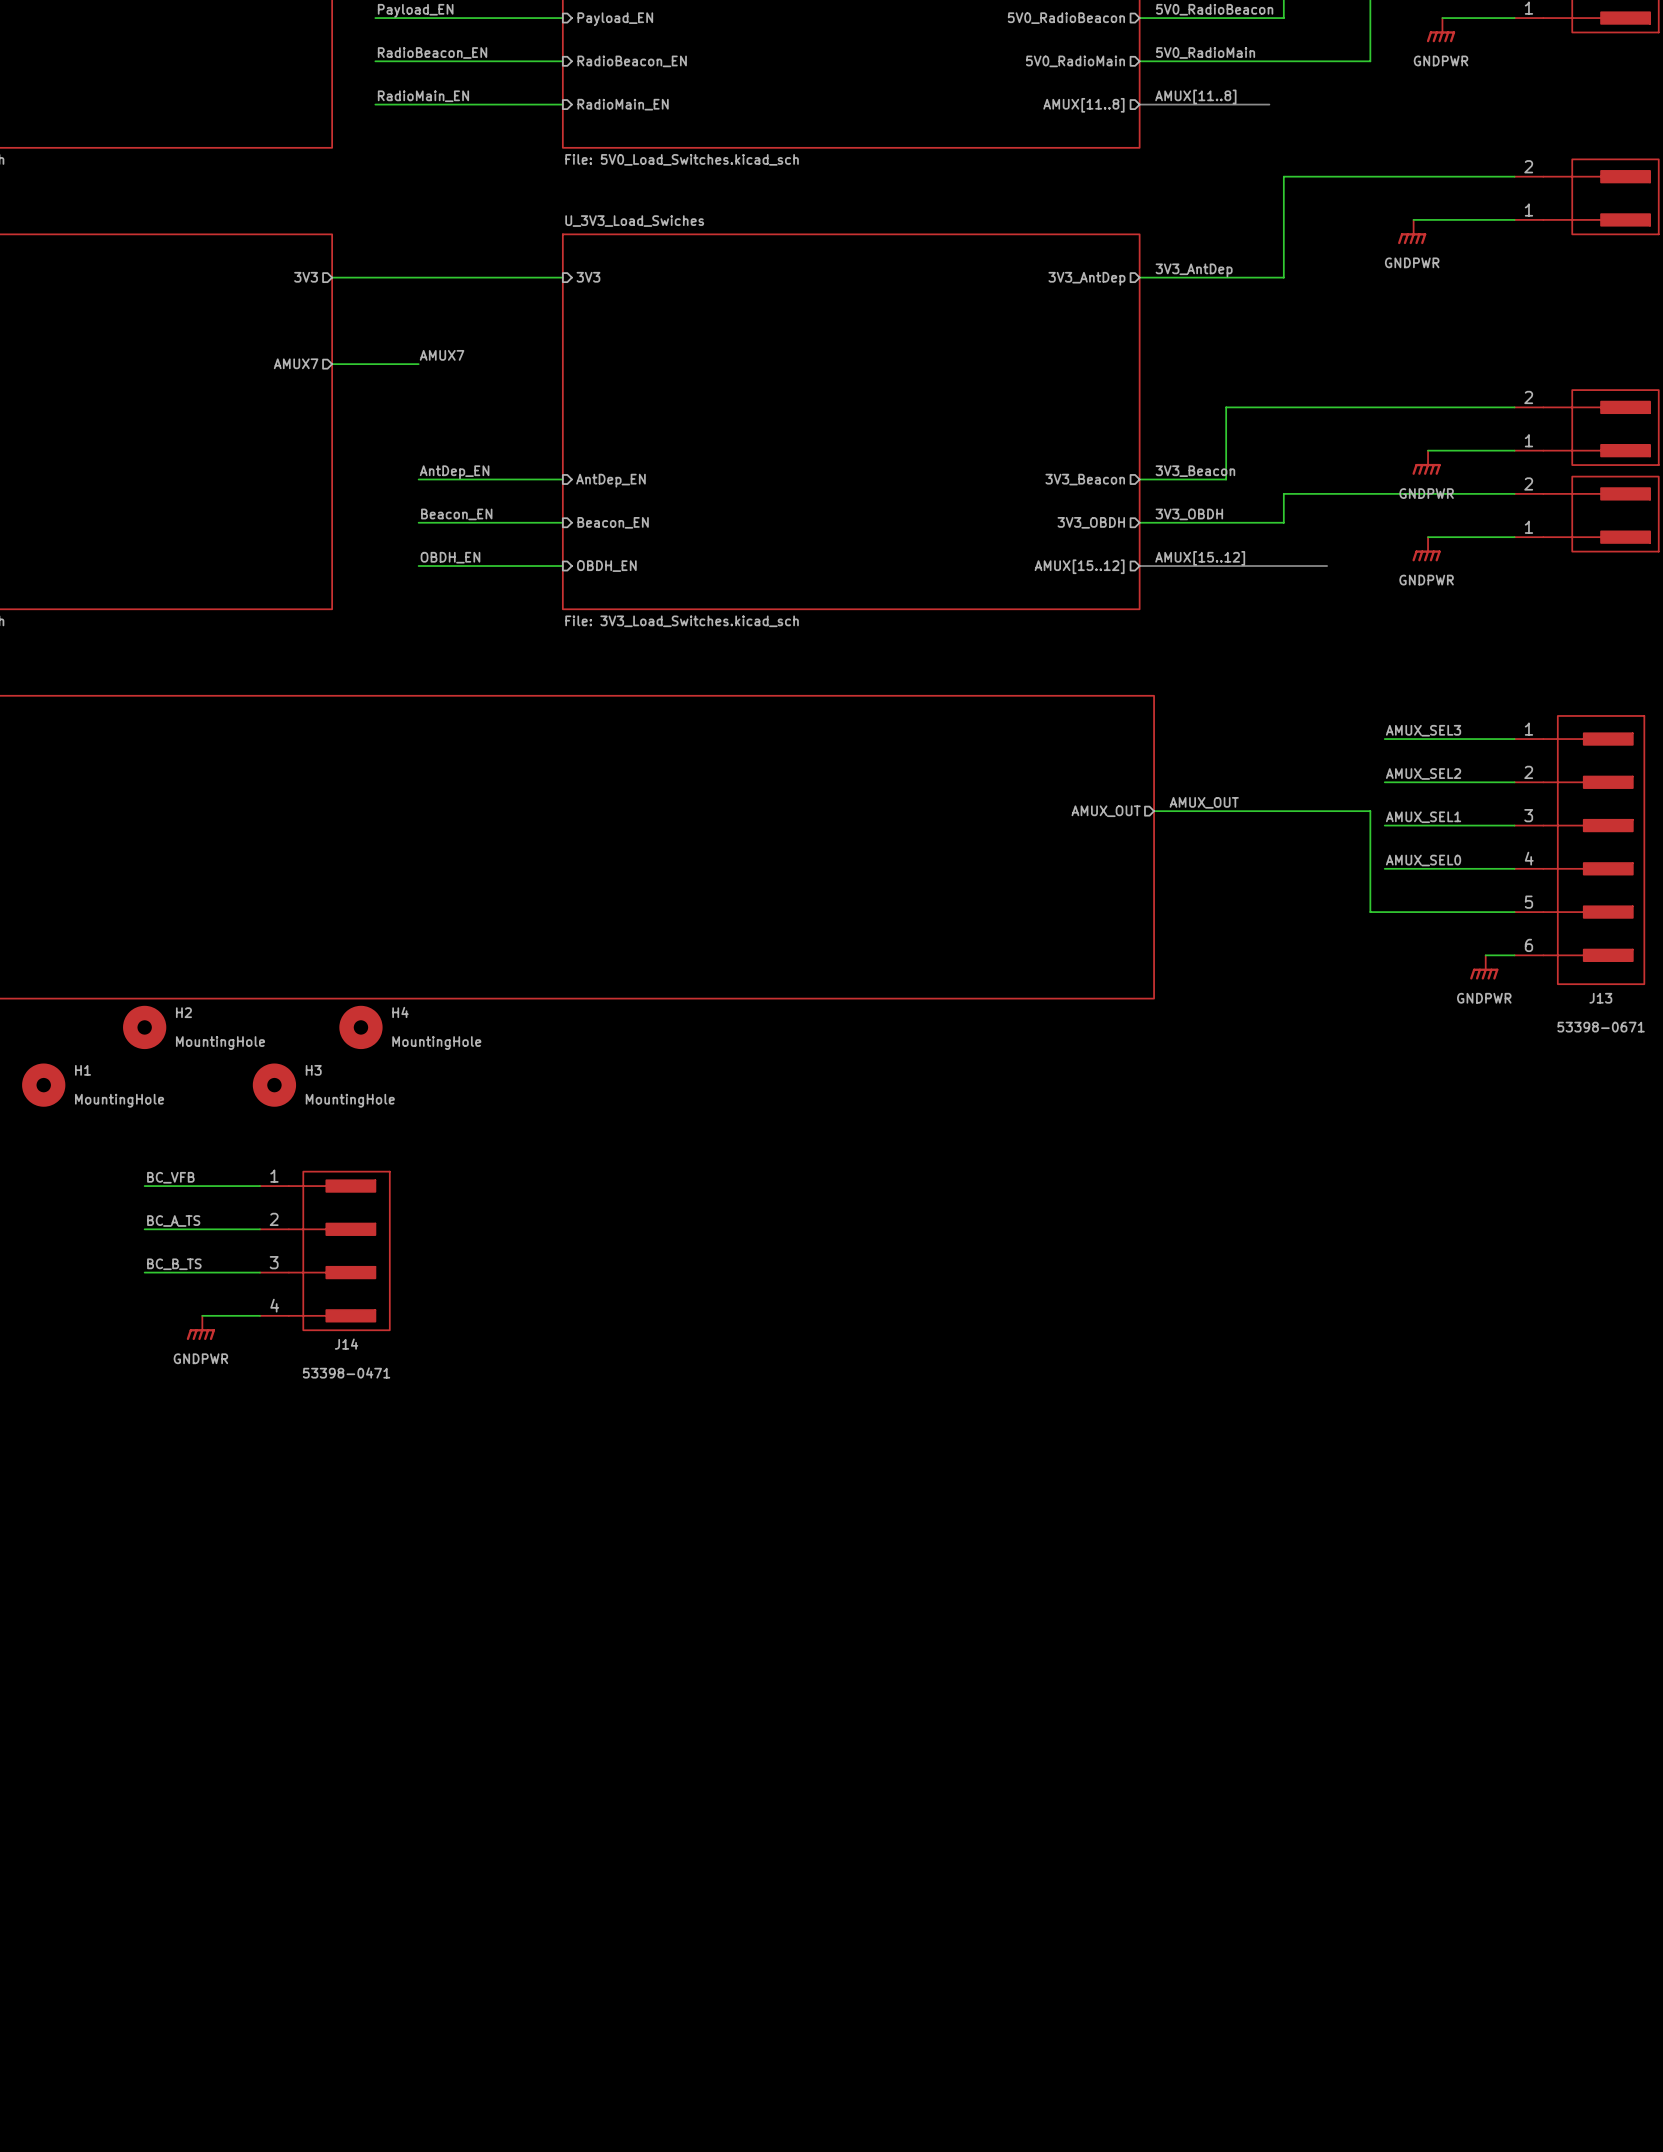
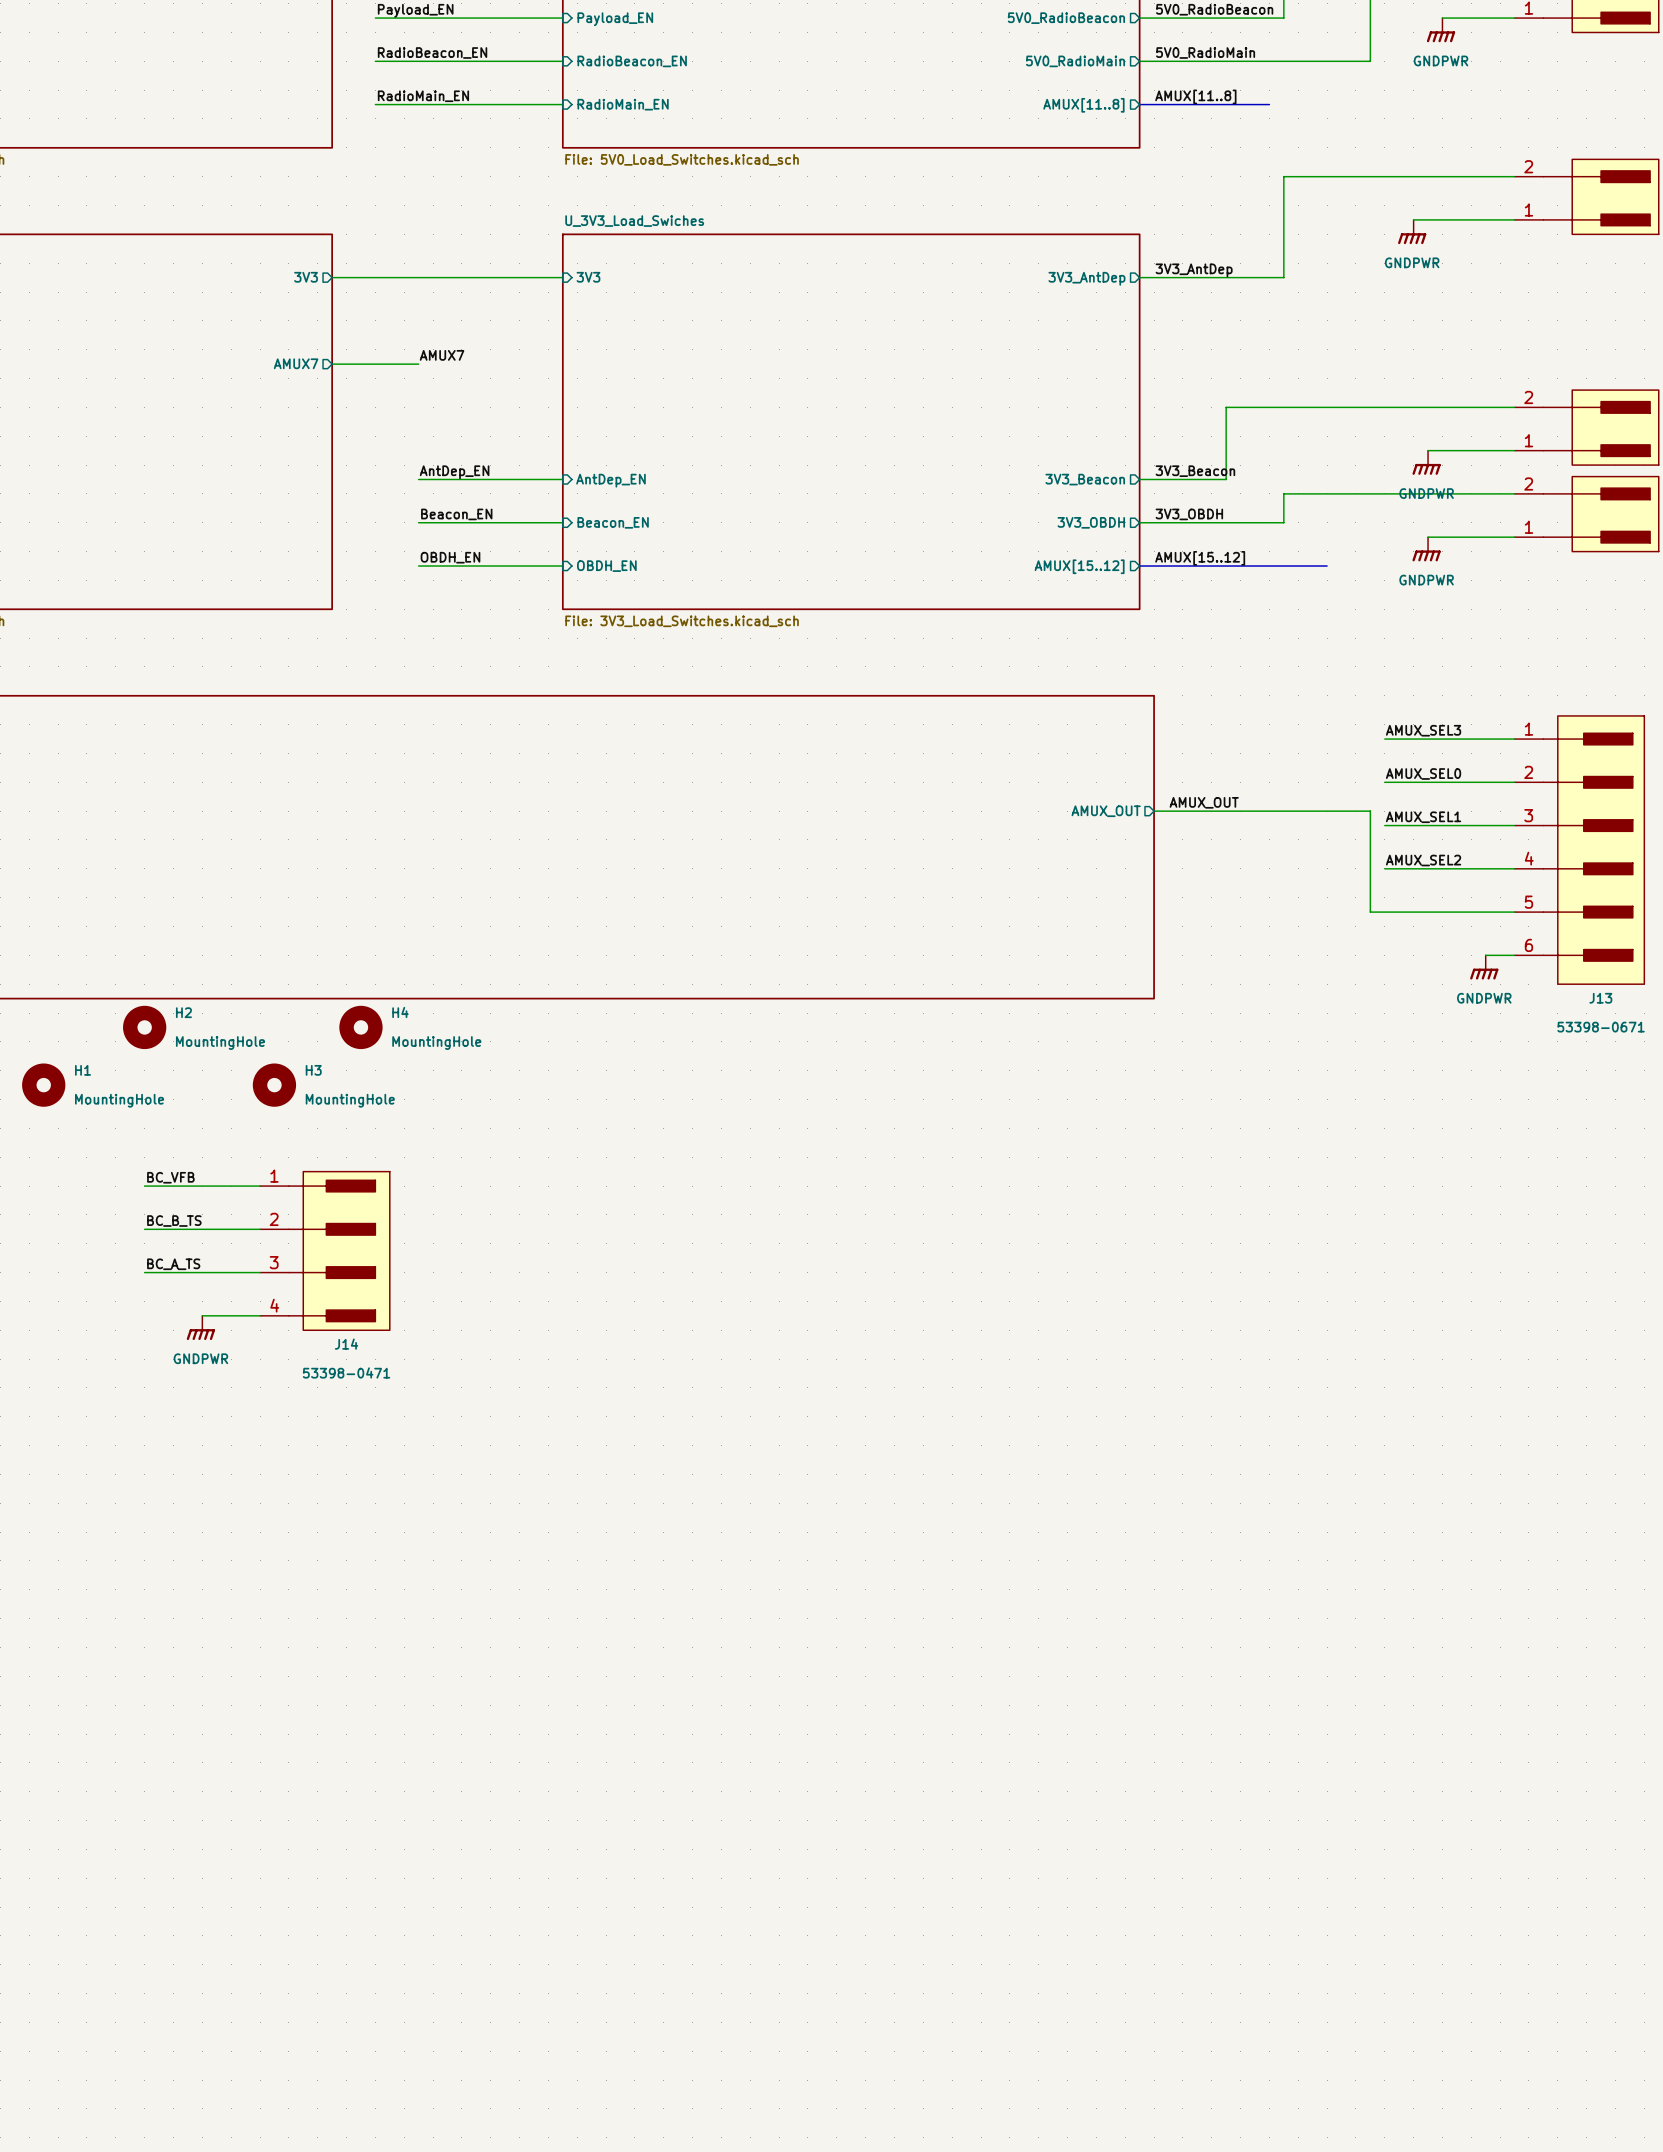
label: AMUX_SEL2 (1423, 773) -> AMUX_SEL0 (1423, 773)
label: AMUX_SEL0 (1423, 860) -> AMUX_SEL2 (1423, 860)
label: BC_A_TS (173, 1221) -> BC_B_TS (174, 1221)
label: BC_B_TS (174, 1264) -> BC_A_TS (173, 1264)

